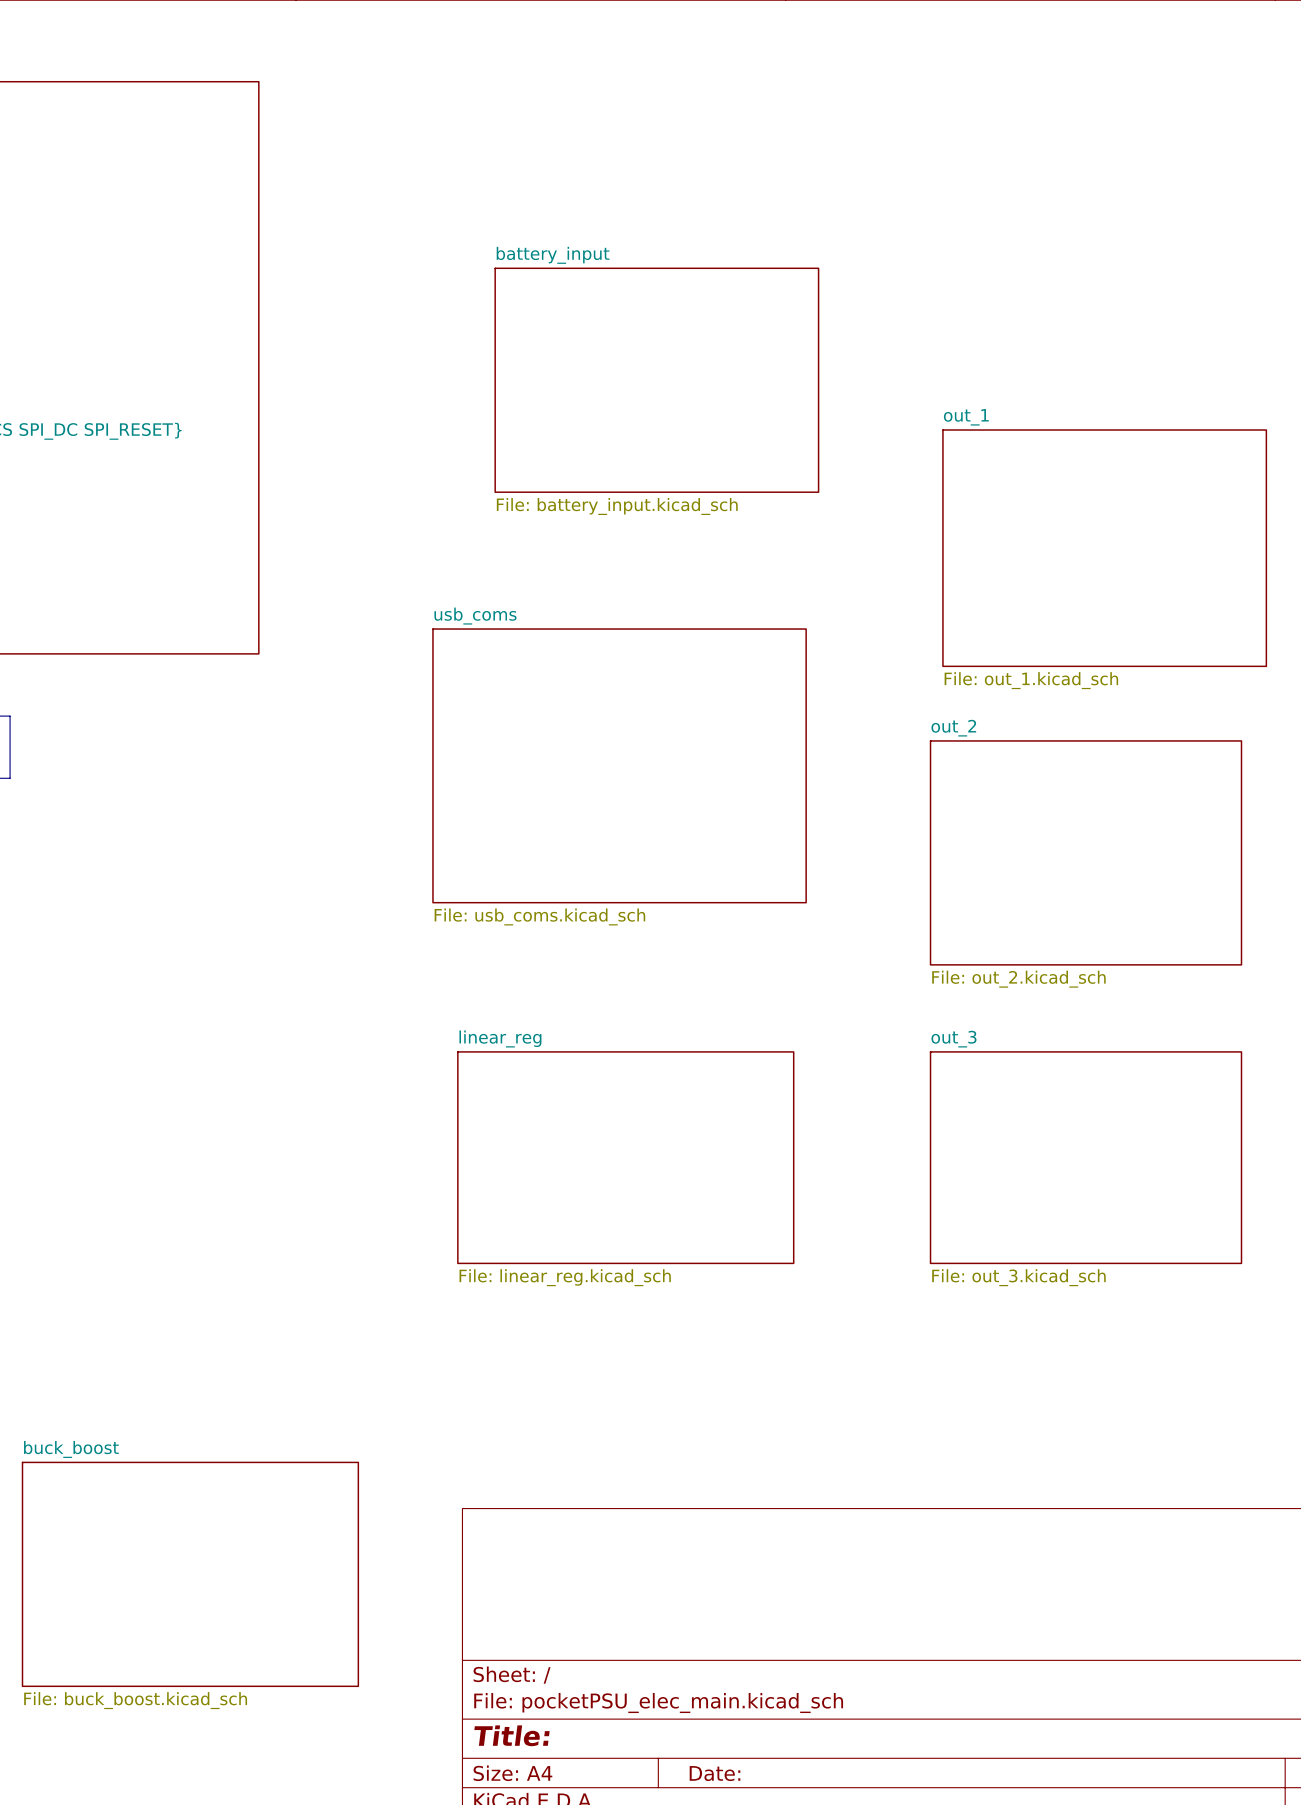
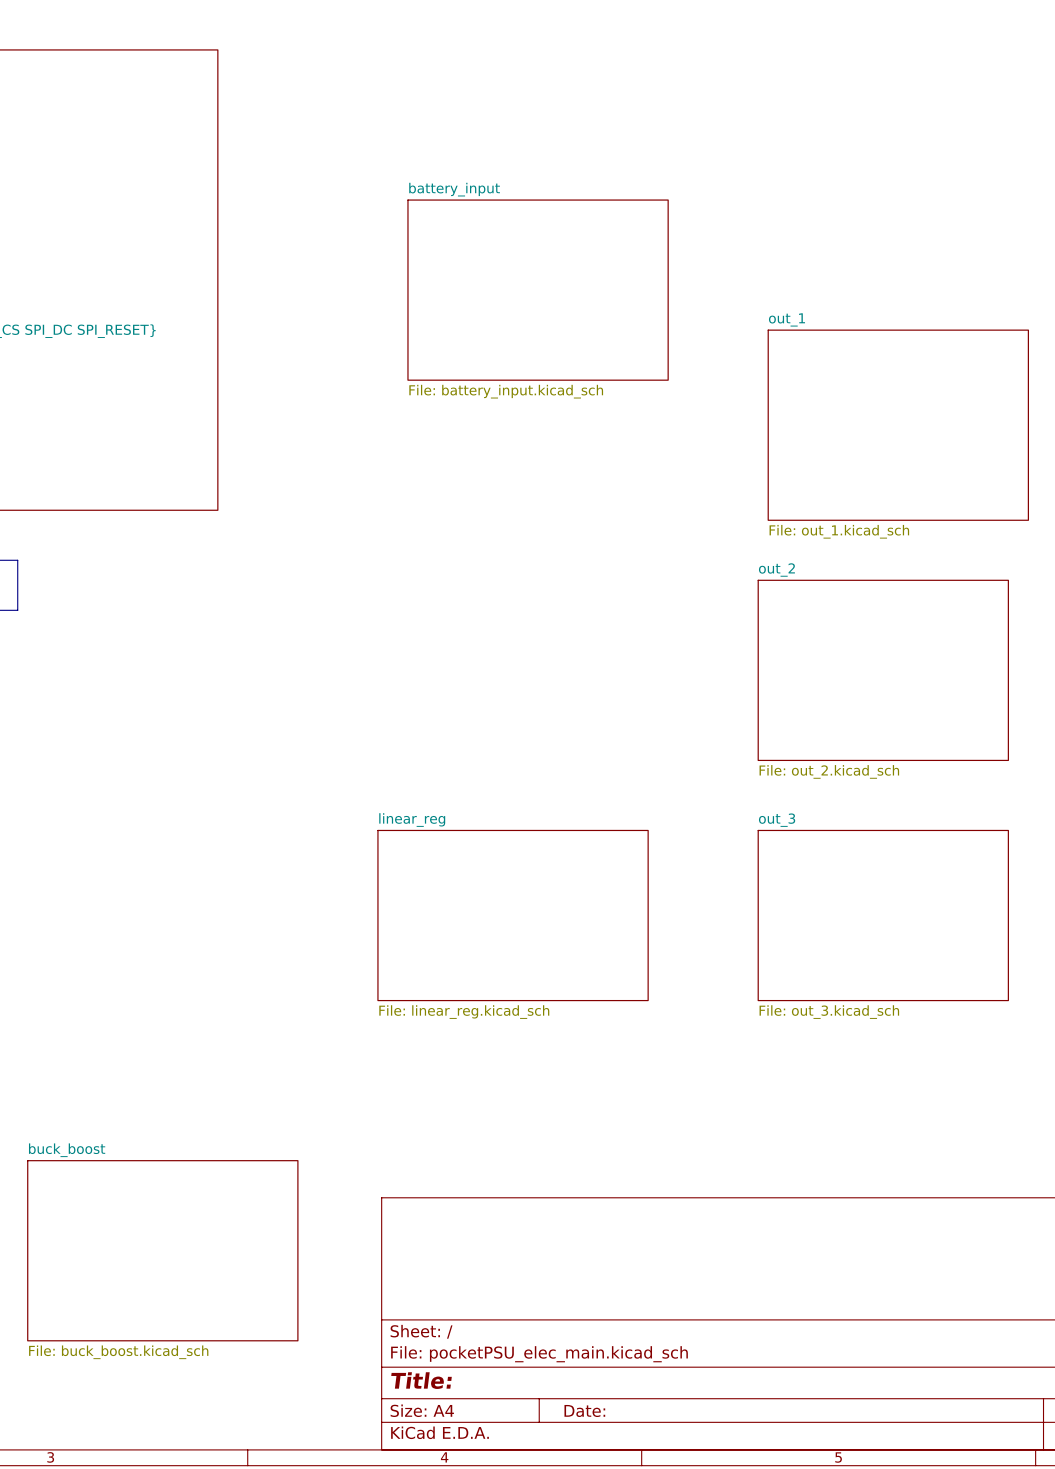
sheet usb_coms: File: usb_coms.kicad_sch (619, 765) -> none

